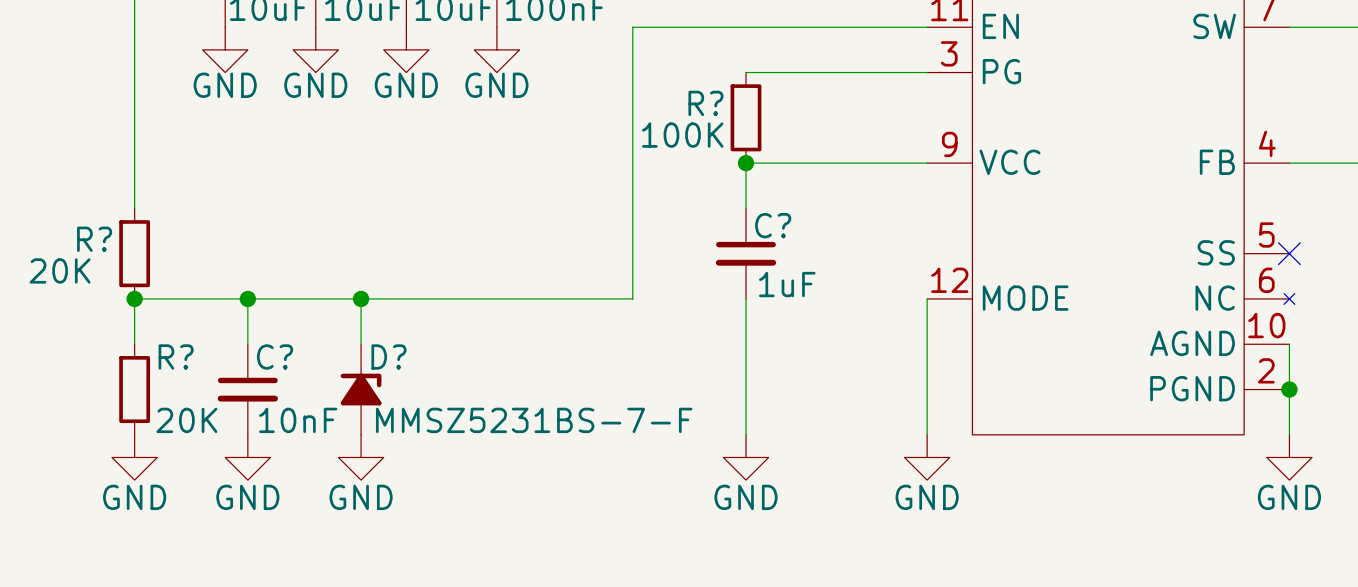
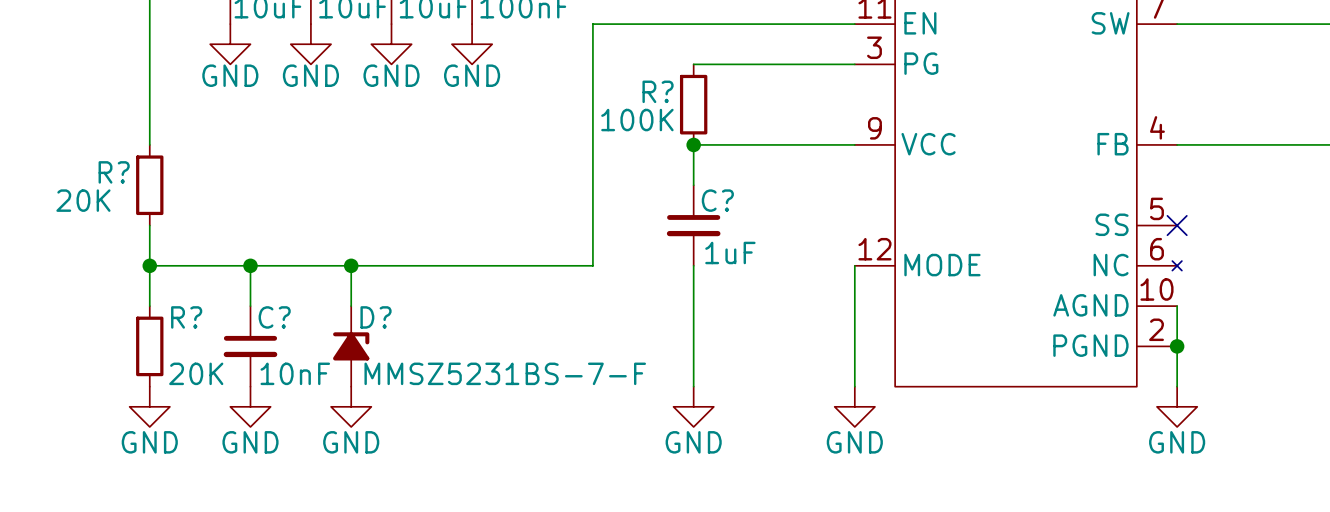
wire: (134, 163) (134, 208) -> (149, 225) (149, 265)
R? position: (134, 253) -> (149, 185)

